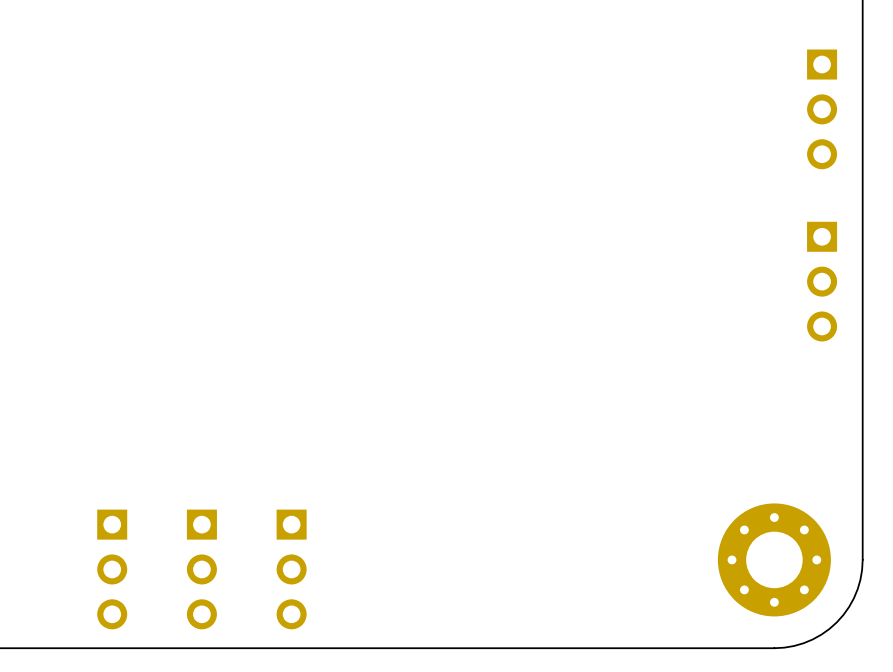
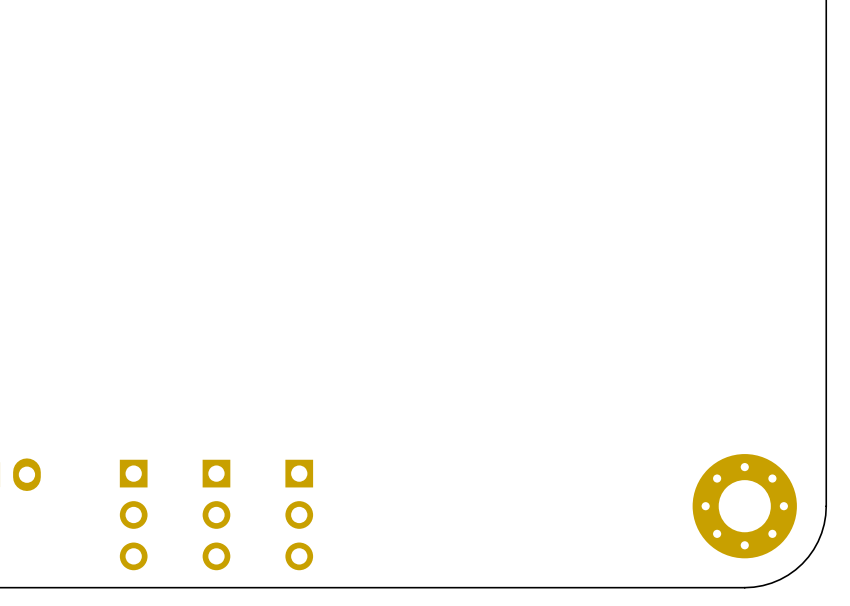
part: (822, 109) -> none
part: (822, 281) -> none

